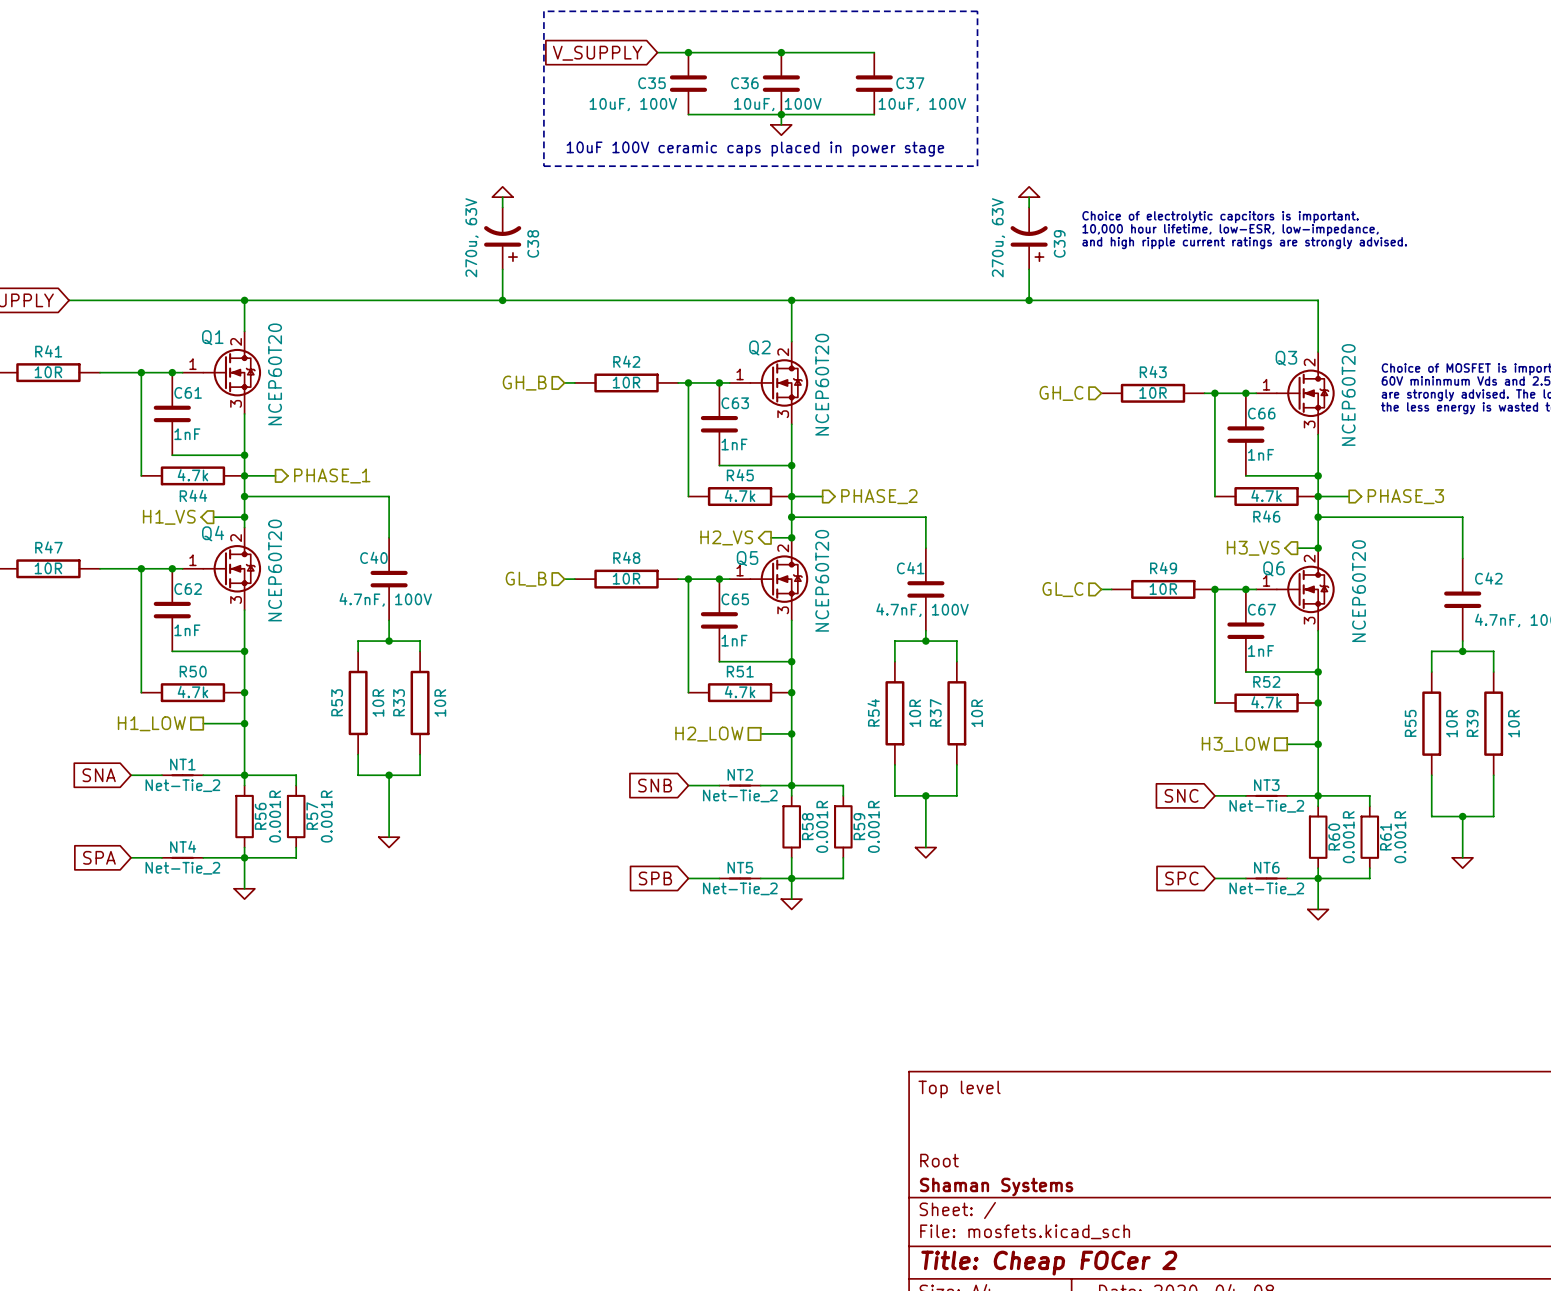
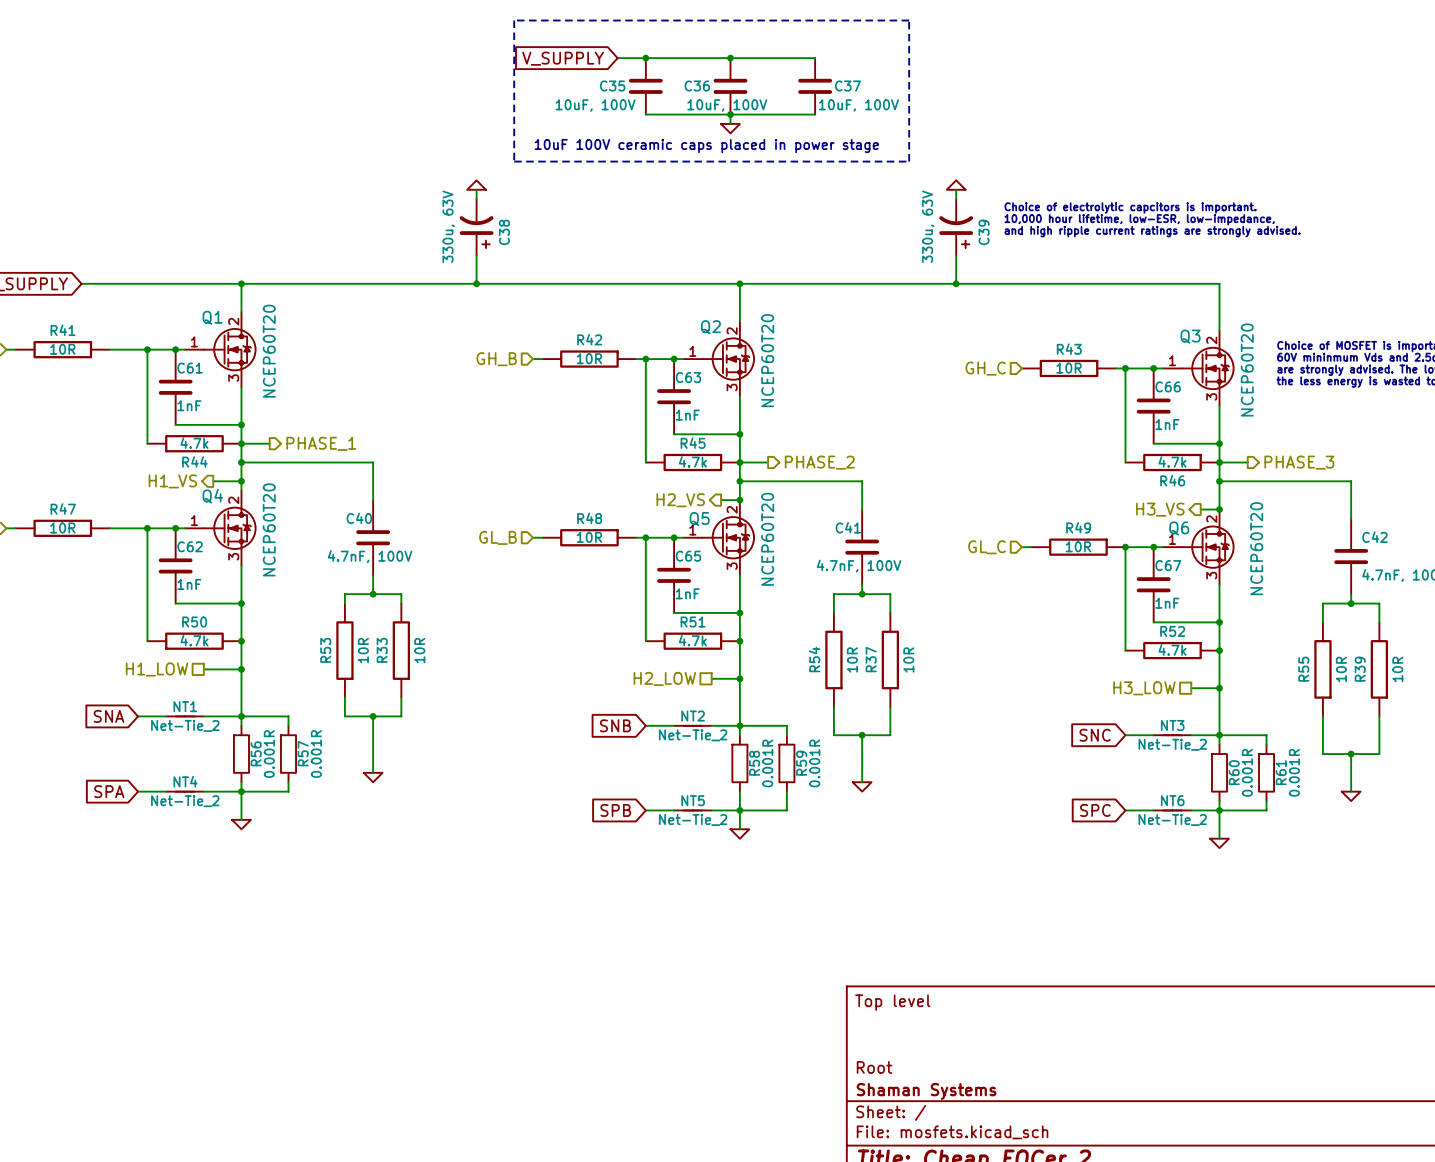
C38 value: 270u, 63V (472, 237) -> 330u, 63V (448, 226)
C39 value: 270u, 63V (998, 237) -> 330u, 63V (928, 226)

